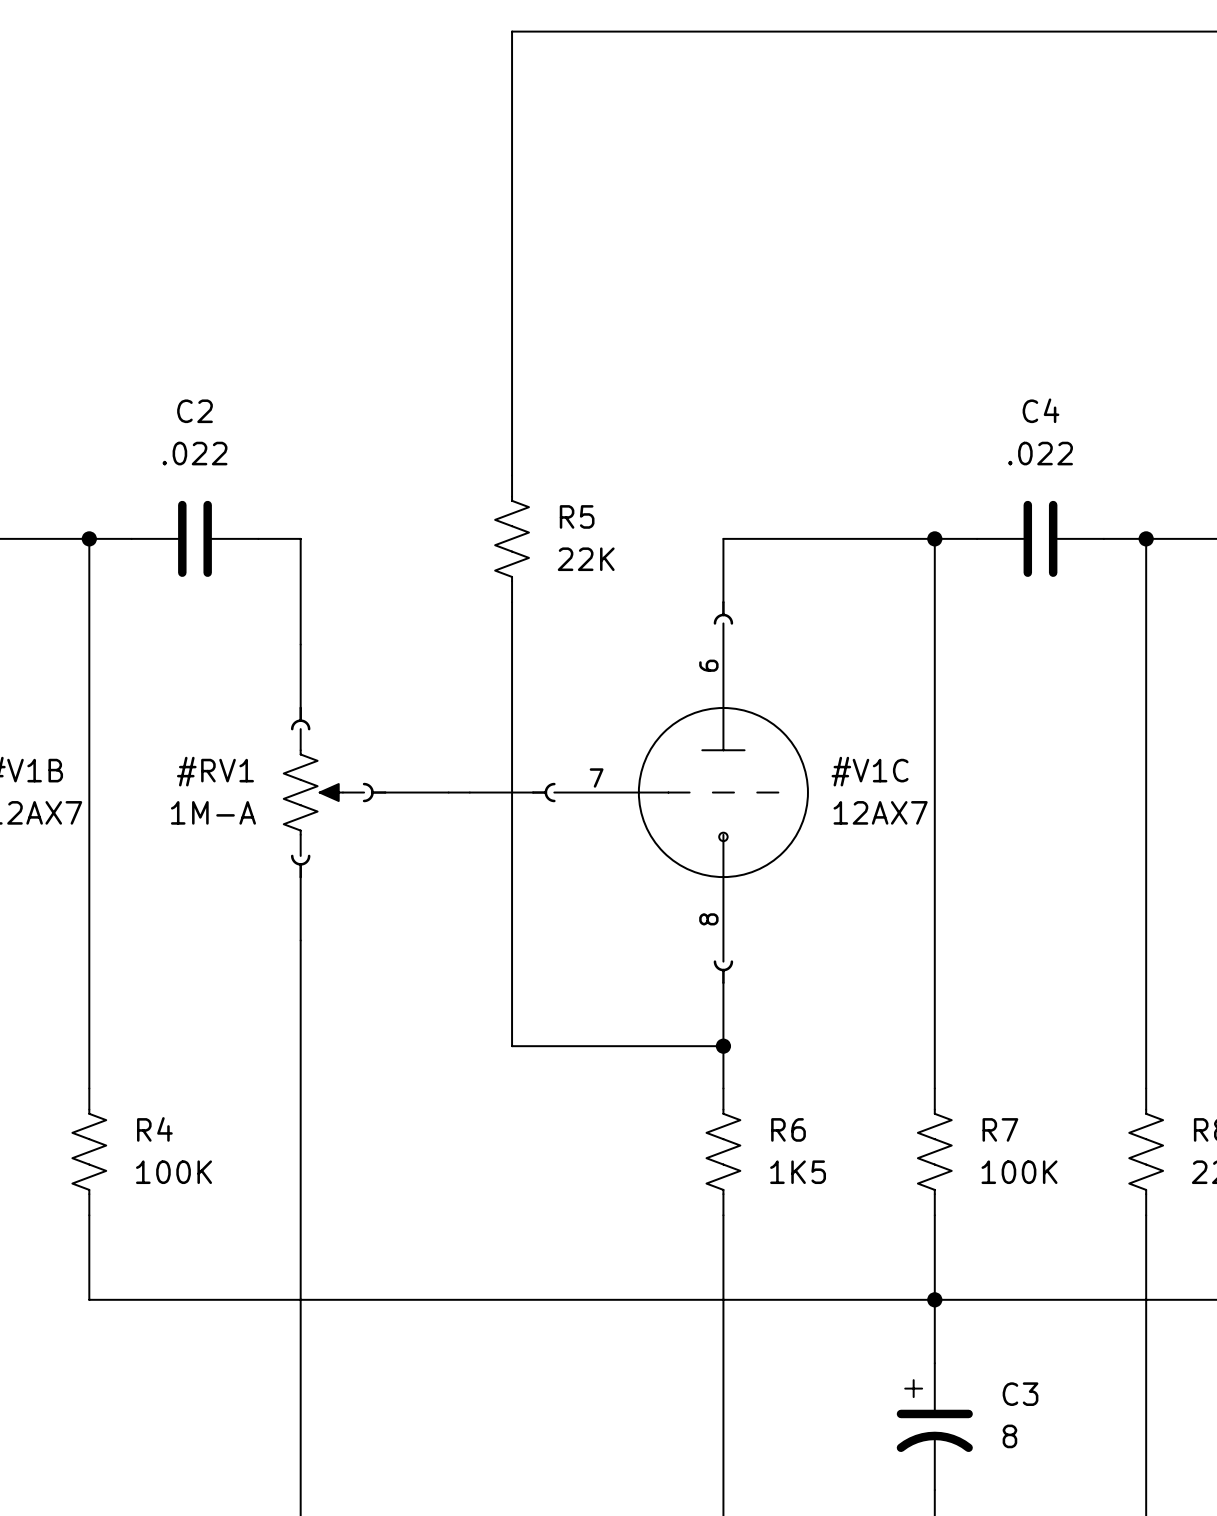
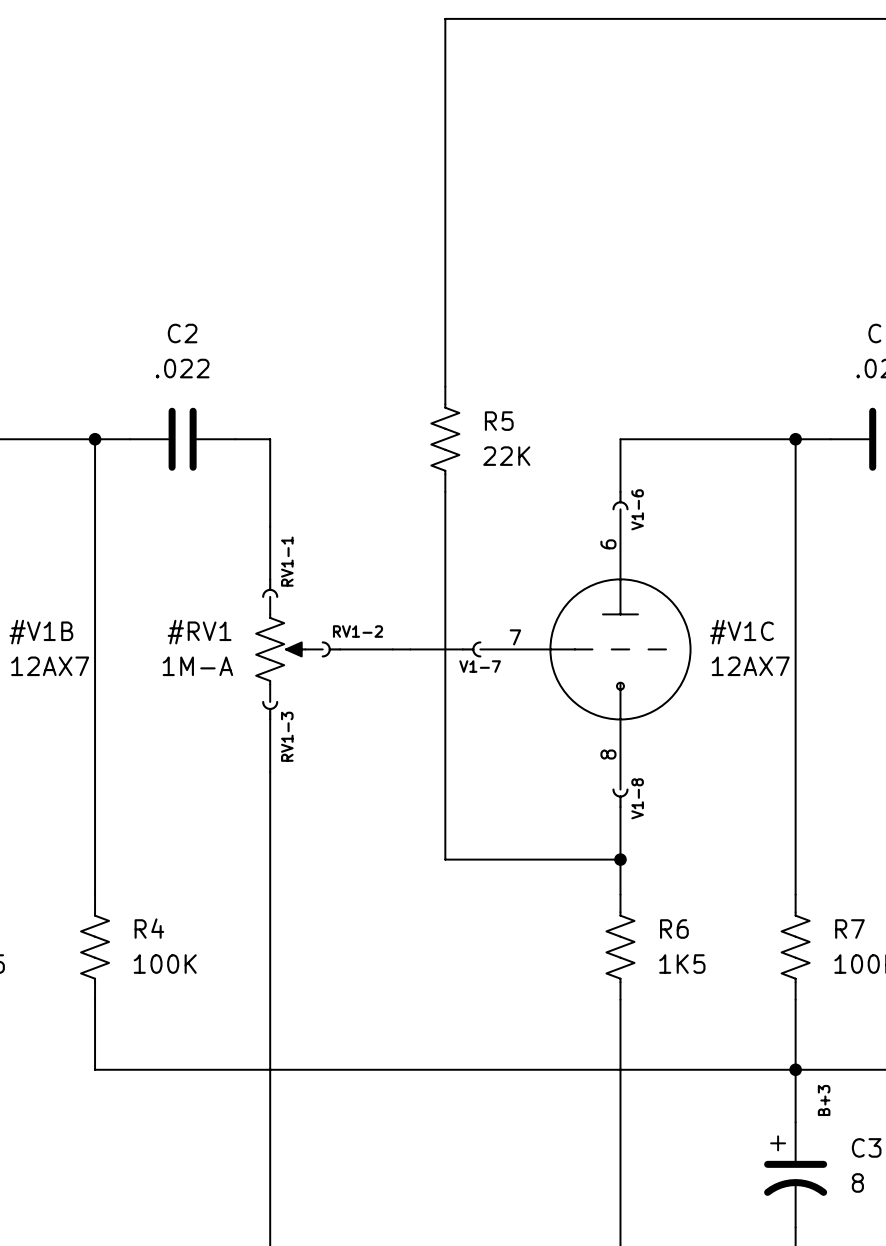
part value: none -> V1-6 (637, 509)
part value: none -> RV1-1 (287, 561)
part value: none -> RV1-2 (358, 631)
part value: none -> V1-7 (480, 666)
part value: none -> RV1-3 (287, 736)
part value: none -> V1-8 (637, 798)
text: none -> B+3 (824, 1100)

